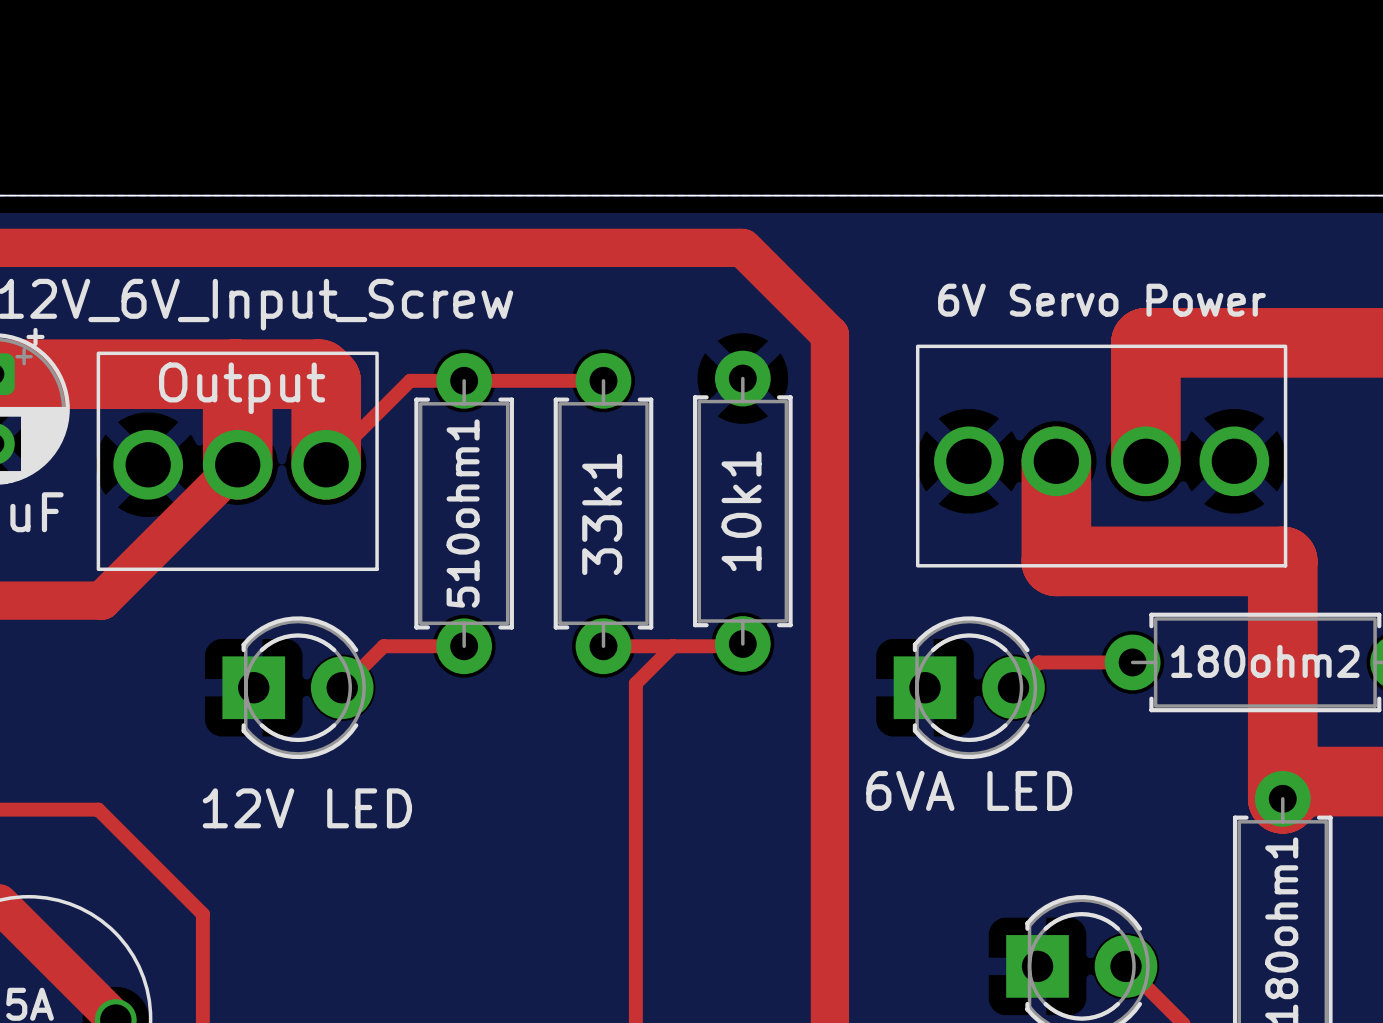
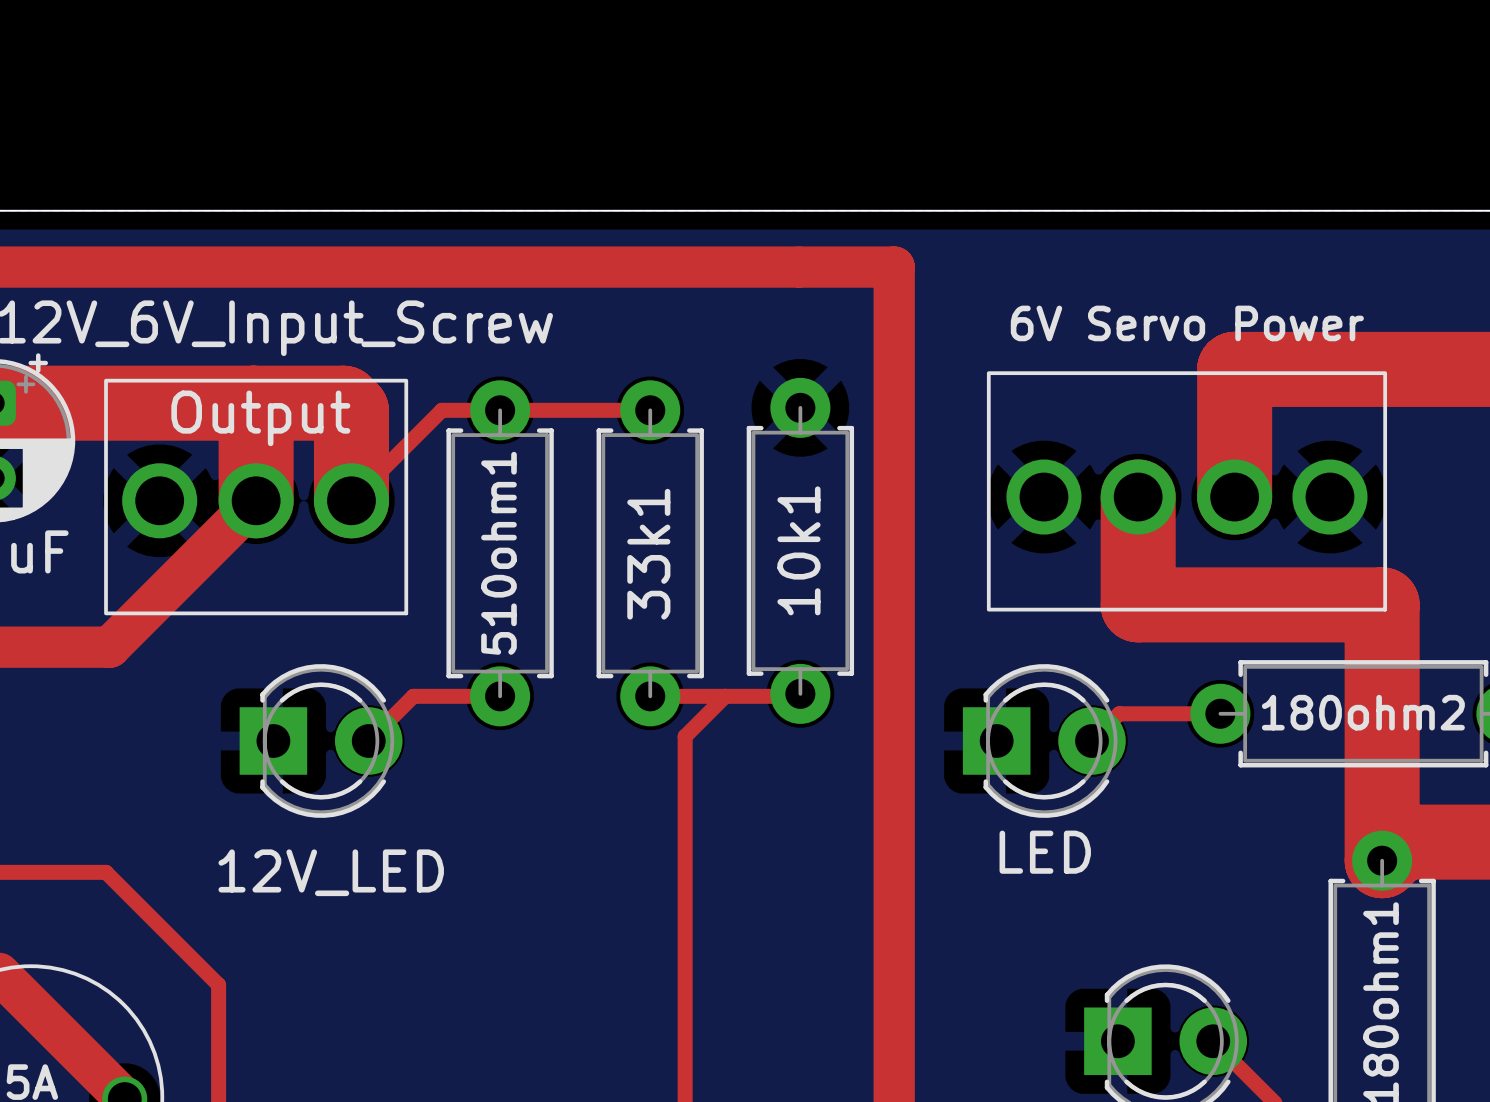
top track: (742, 247) (829, 334) -> (800, 267) (894, 267) (894, 360)
part value: 6VA LED (969, 790) -> LED (1045, 852)
text: 12V LED (307, 808) -> 12V_LED (331, 872)

